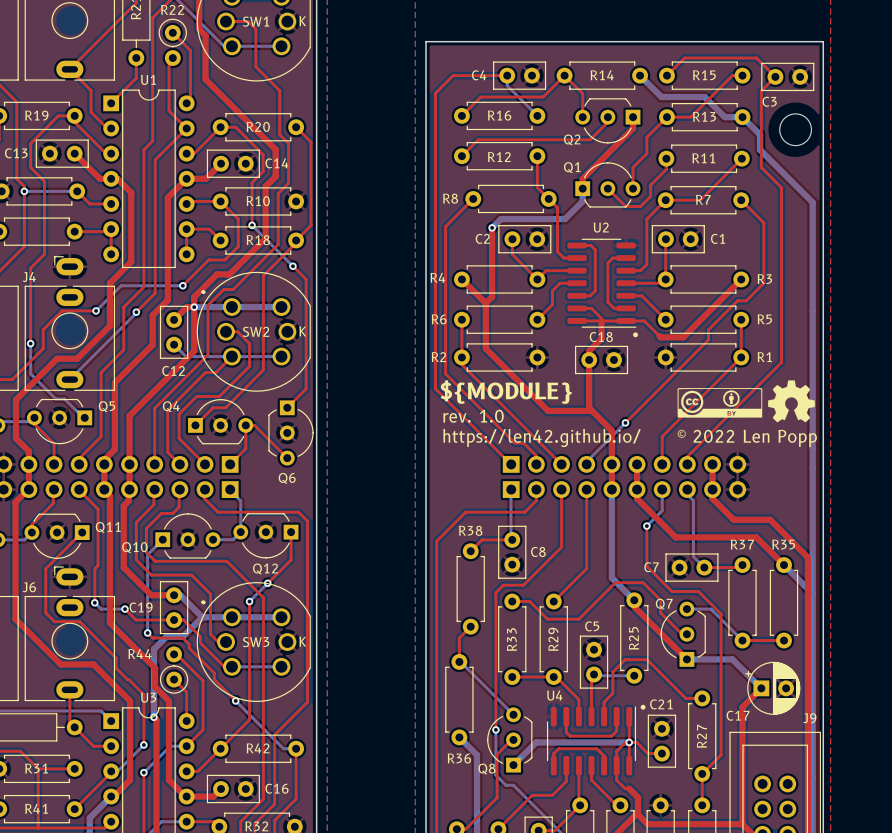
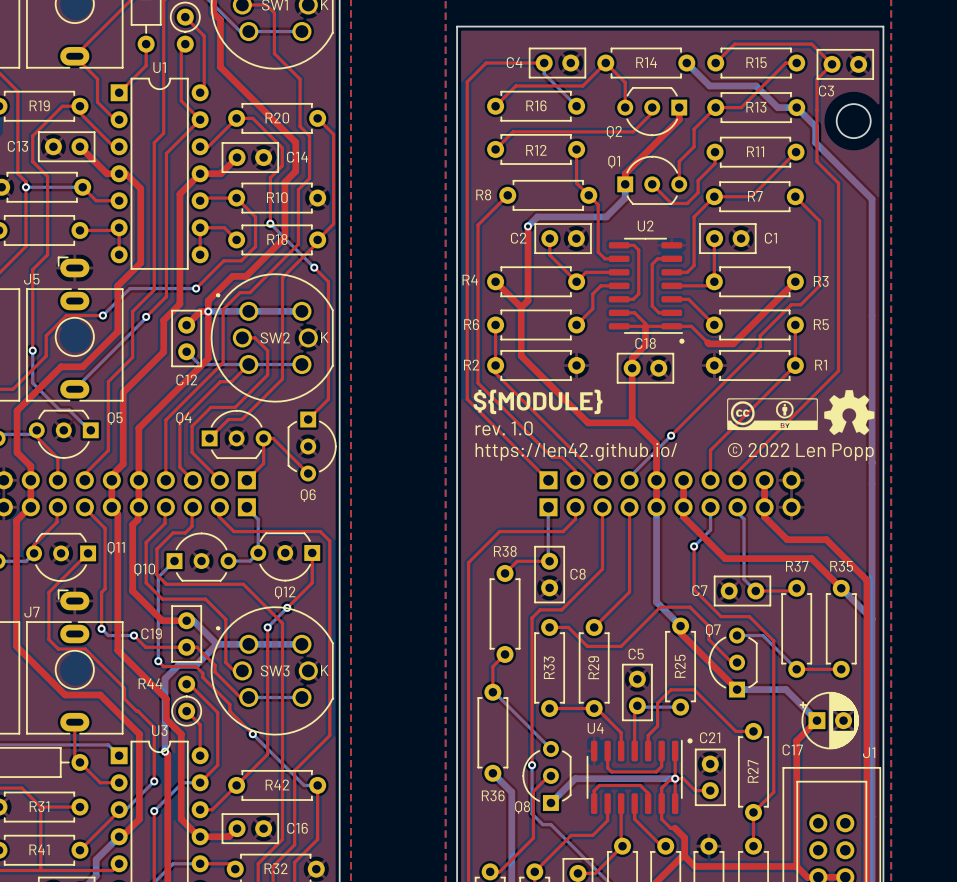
J4 name: J4 (29, 277) -> J5 (31, 279)
J6 name: J6 (29, 587) -> J7 (32, 612)
J9 name: J9 (809, 718) -> J1 (869, 752)

